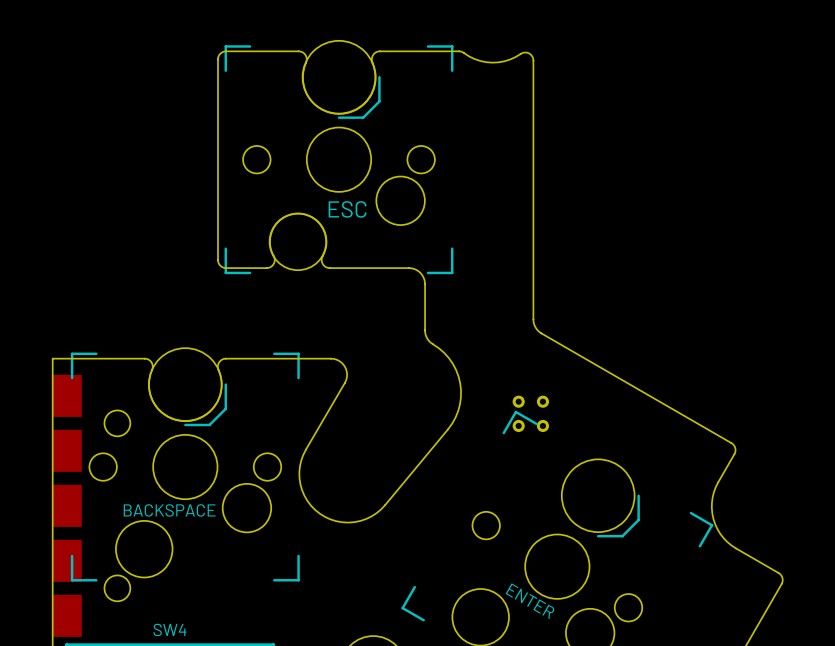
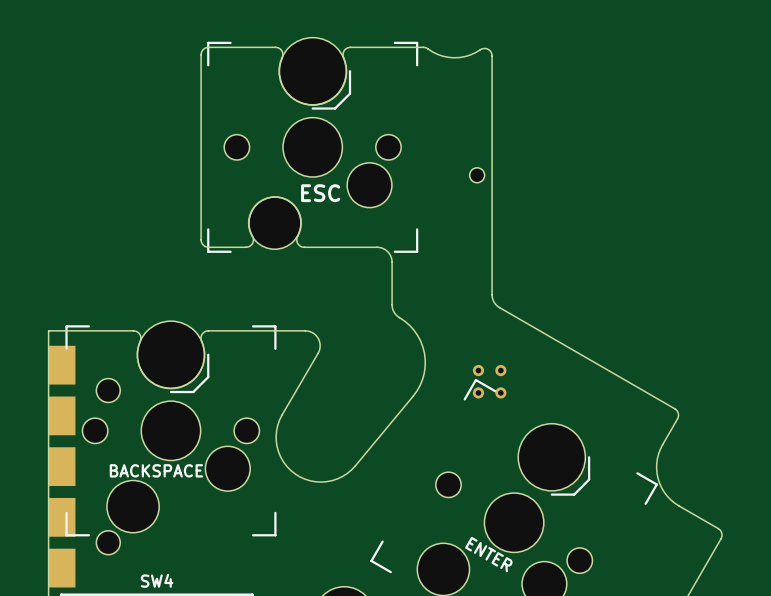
part: none -> (477, 175)

